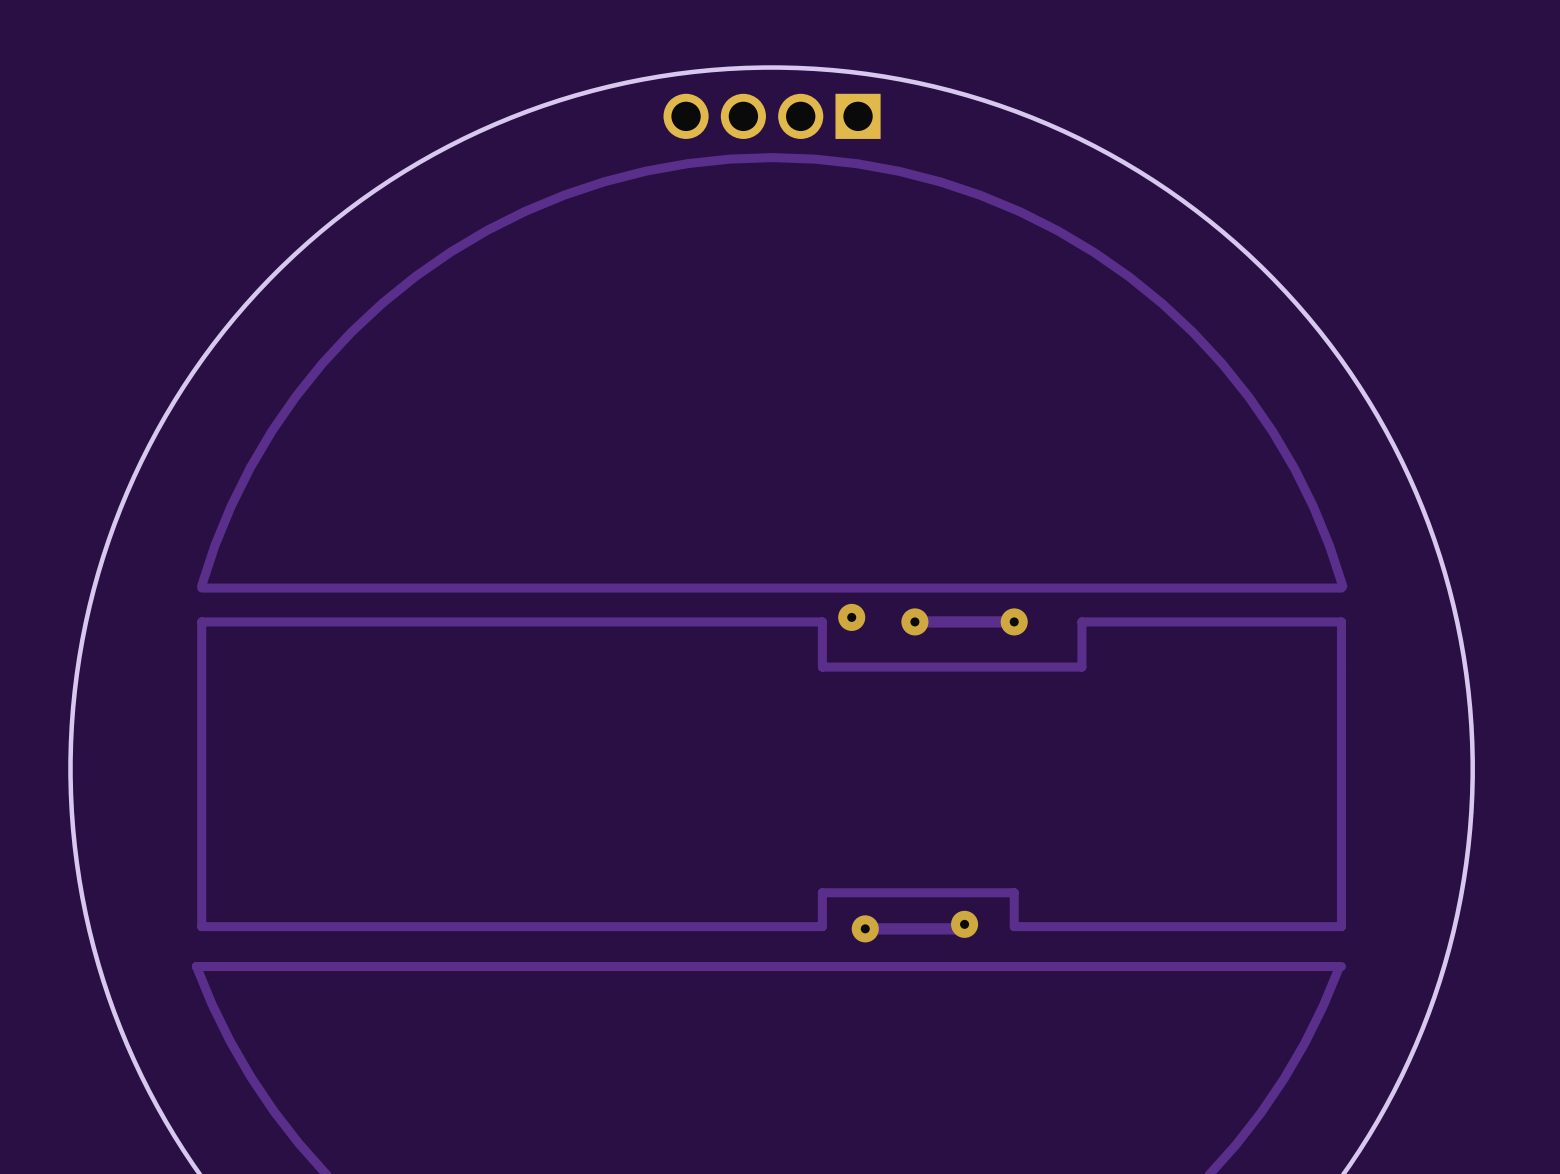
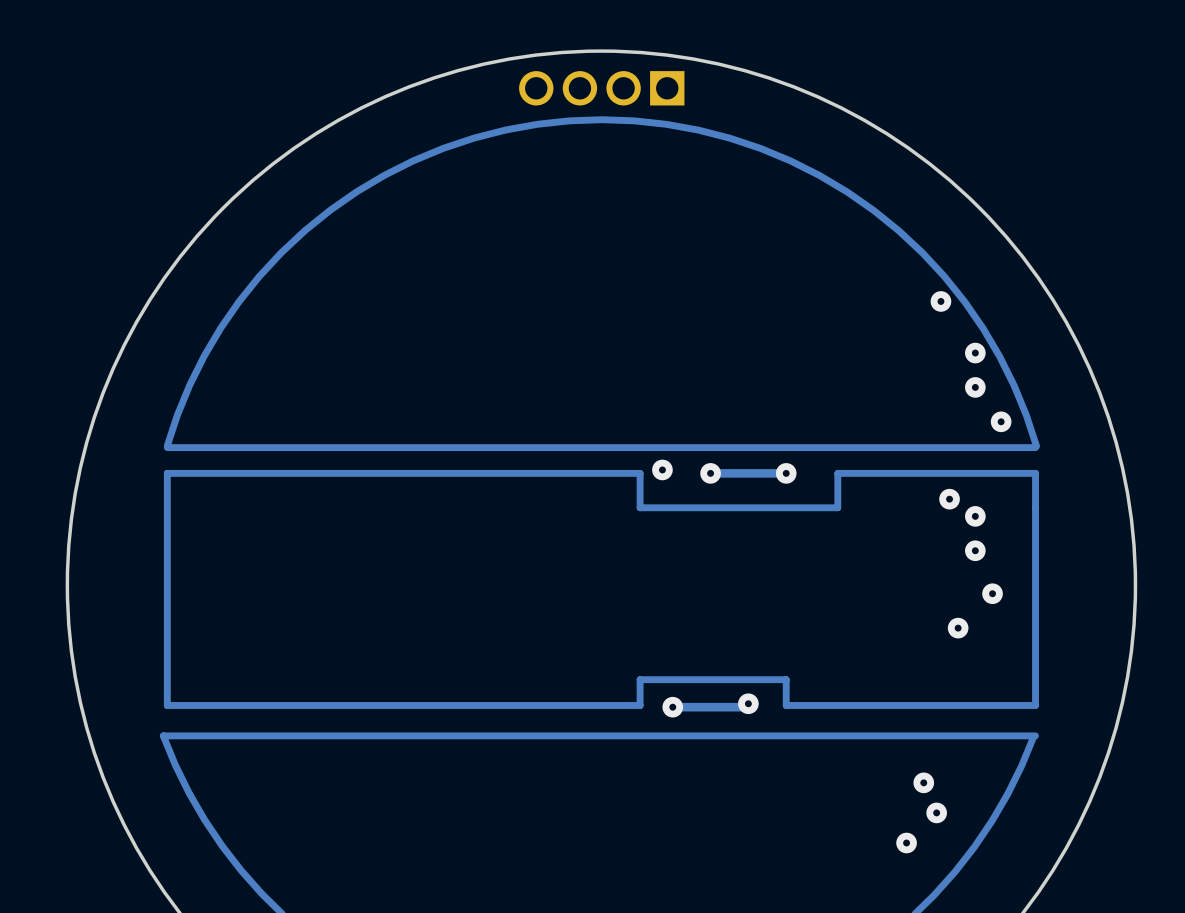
via: none -> (940, 301)
via: none -> (975, 353)
via: none -> (975, 387)
via: none -> (1001, 421)
via: none -> (949, 499)
via: none -> (975, 516)
via: none -> (975, 550)
via: none -> (992, 593)
via: none -> (958, 628)
via: none -> (923, 782)
via: none -> (936, 812)
via: none -> (906, 843)

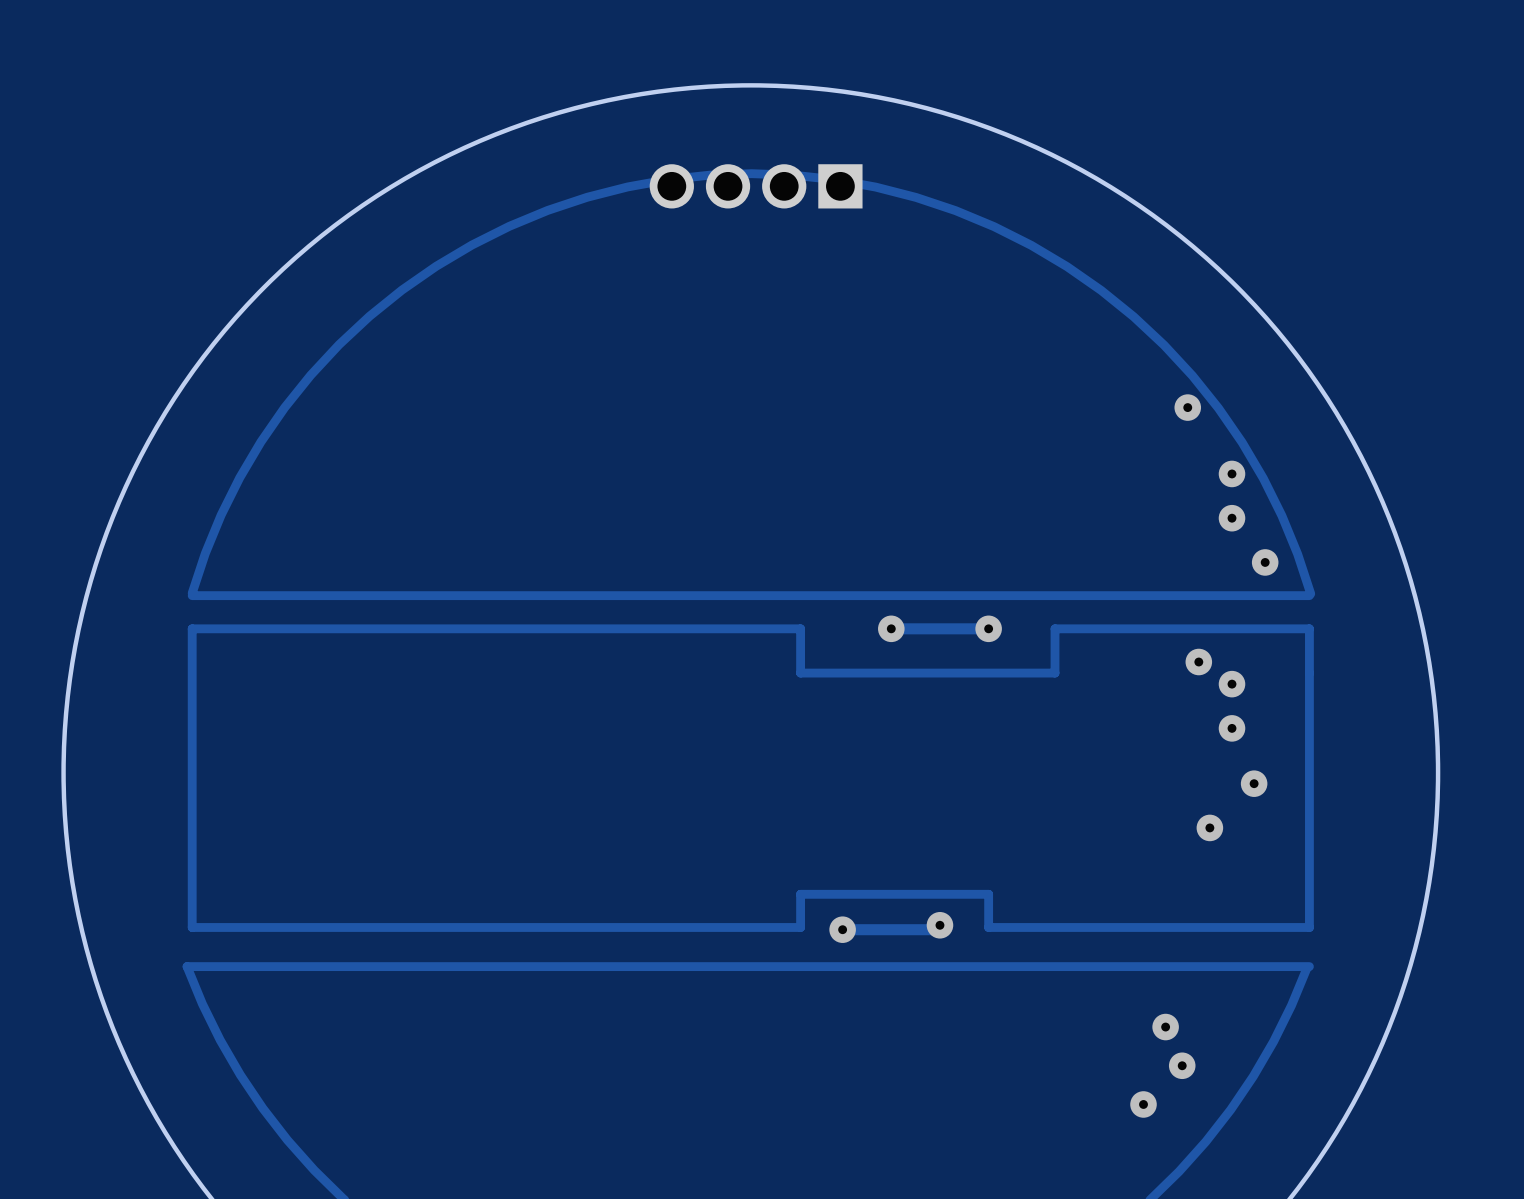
part position: (601, 88) -> (756, 186)
via: (662, 469) -> none

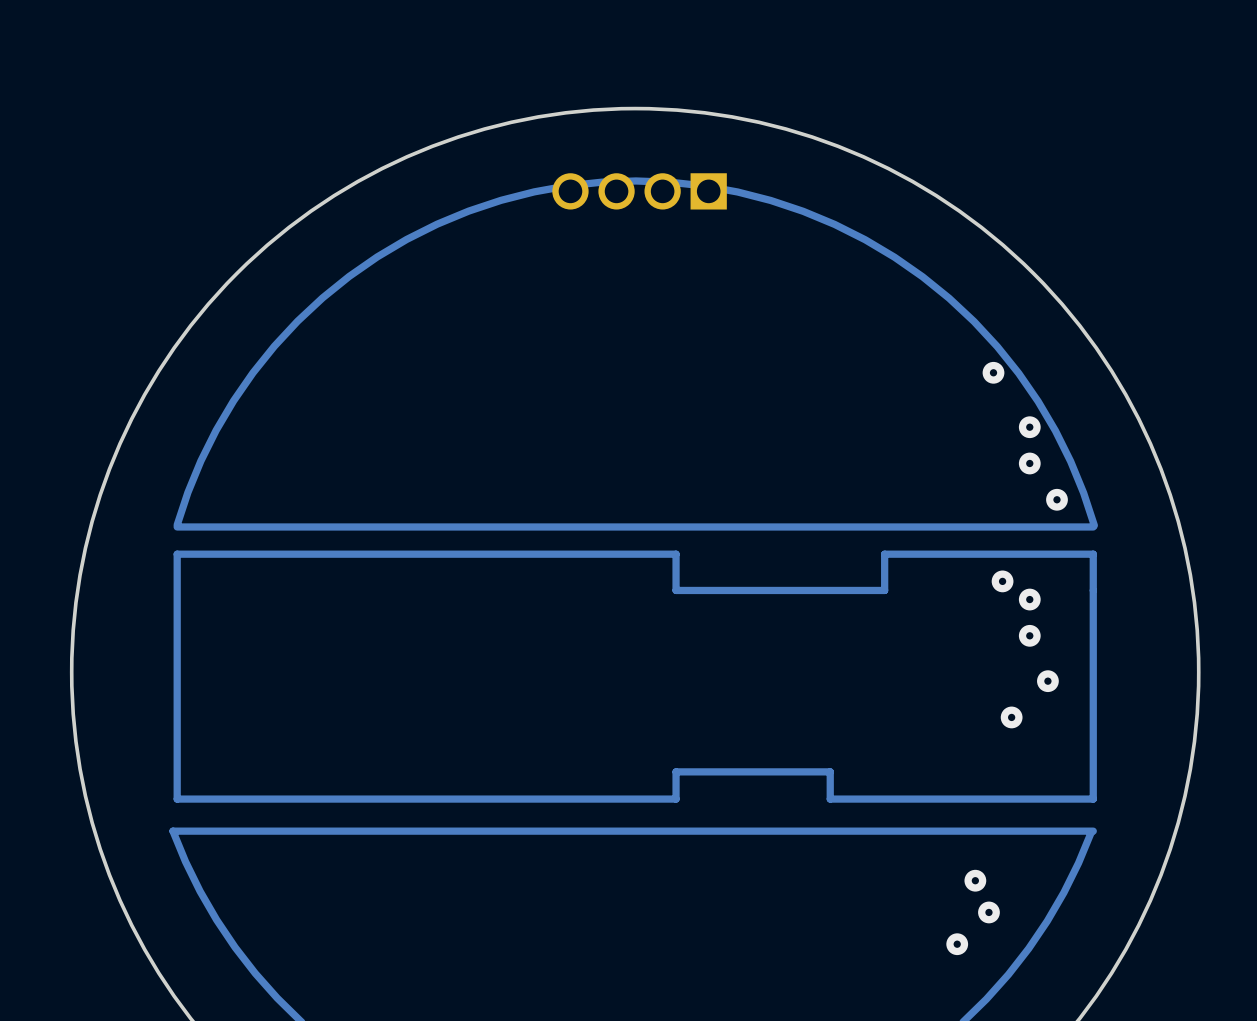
via: (891, 628) -> none
track: (988, 628) (891, 628) -> none
via: (988, 628) -> none
track: (939, 925) (935, 929) (842, 929) -> none
via: (939, 925) -> none
via: (842, 929) -> none

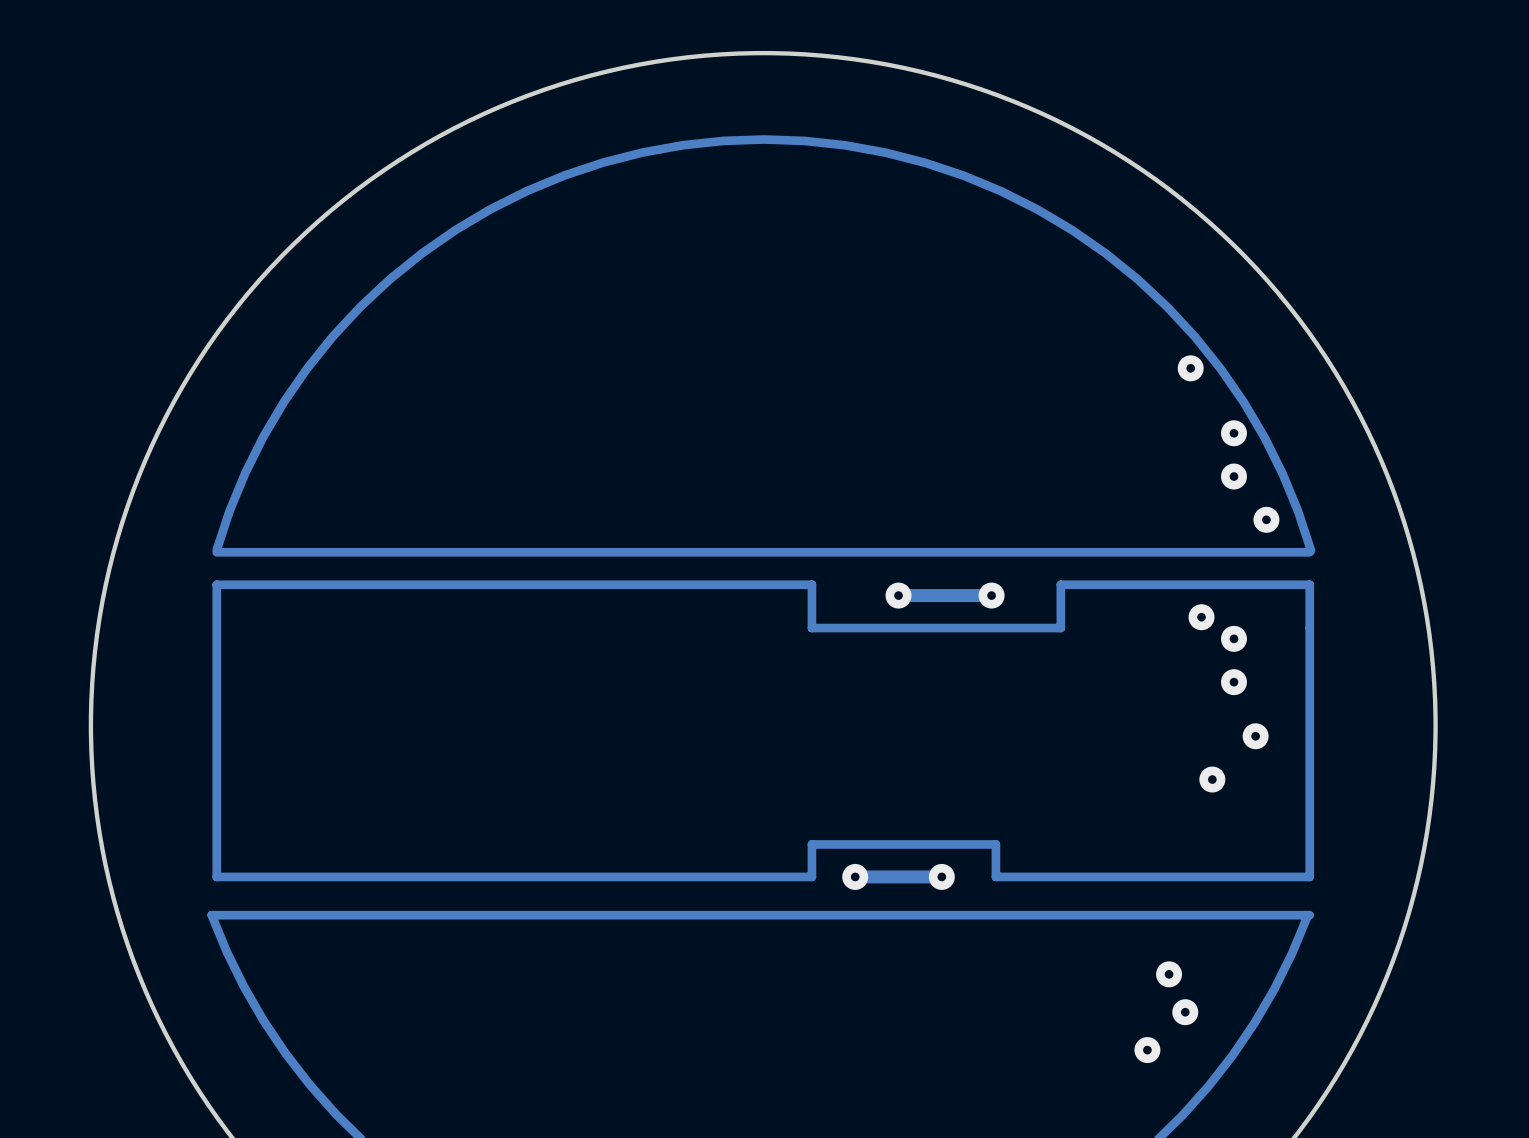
part: (639, 191) -> none
via: none -> (898, 595)
track: none -> (991, 595) (898, 595)
via: none -> (991, 595)
via: none -> (855, 876)
track: none -> (941, 876) (855, 876)
via: none -> (941, 876)

